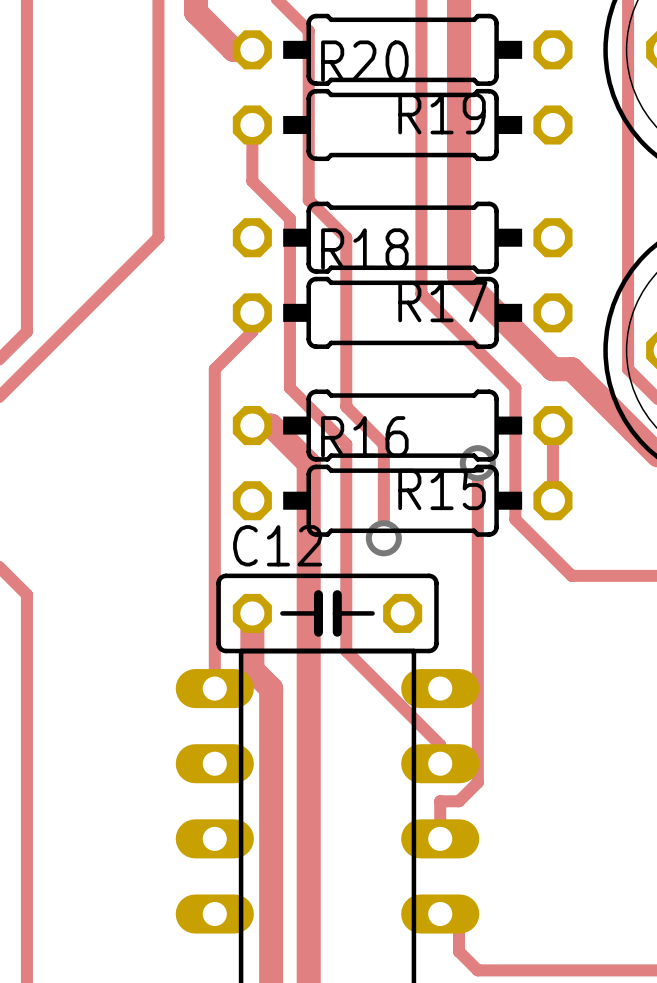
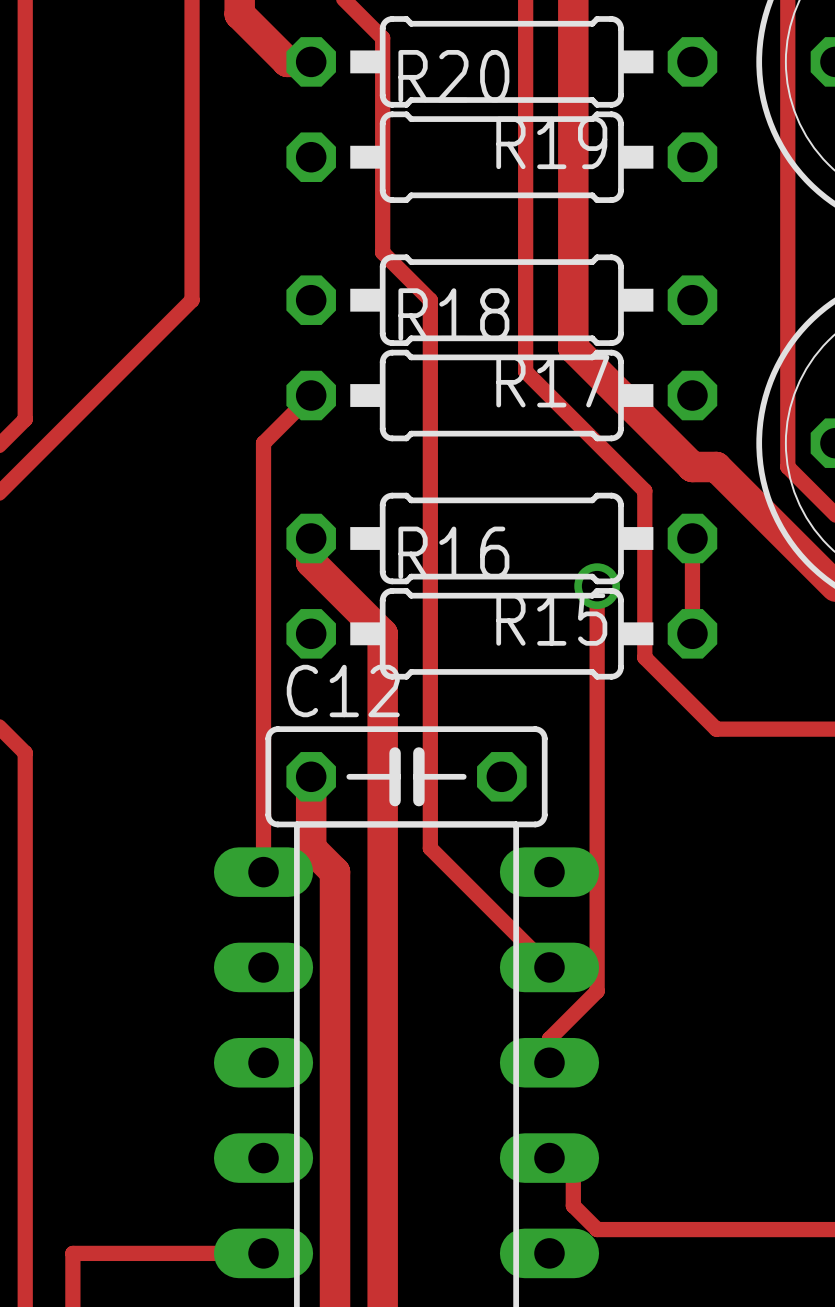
track: (252, 124) (252, 181) (289, 218) (289, 388) (346, 444) -> none
track: (252, 312) (252, 331) (214, 369) -> (311, 395) (263, 443) (263, 467)
track: (346, 406) (383, 444) (383, 538) -> (430, 514) (430, 562)
track: (252, 425) (271, 425) (308, 463) (308, 500) -> (311, 538) (311, 562) (382, 633)
via: (383, 538) -> none
track: (346, 651) (440, 744) (440, 763) -> (430, 824) (430, 848) (549, 967)
track: (459, 801) (440, 801) (440, 820) -> (573, 1015) (549, 1038)

